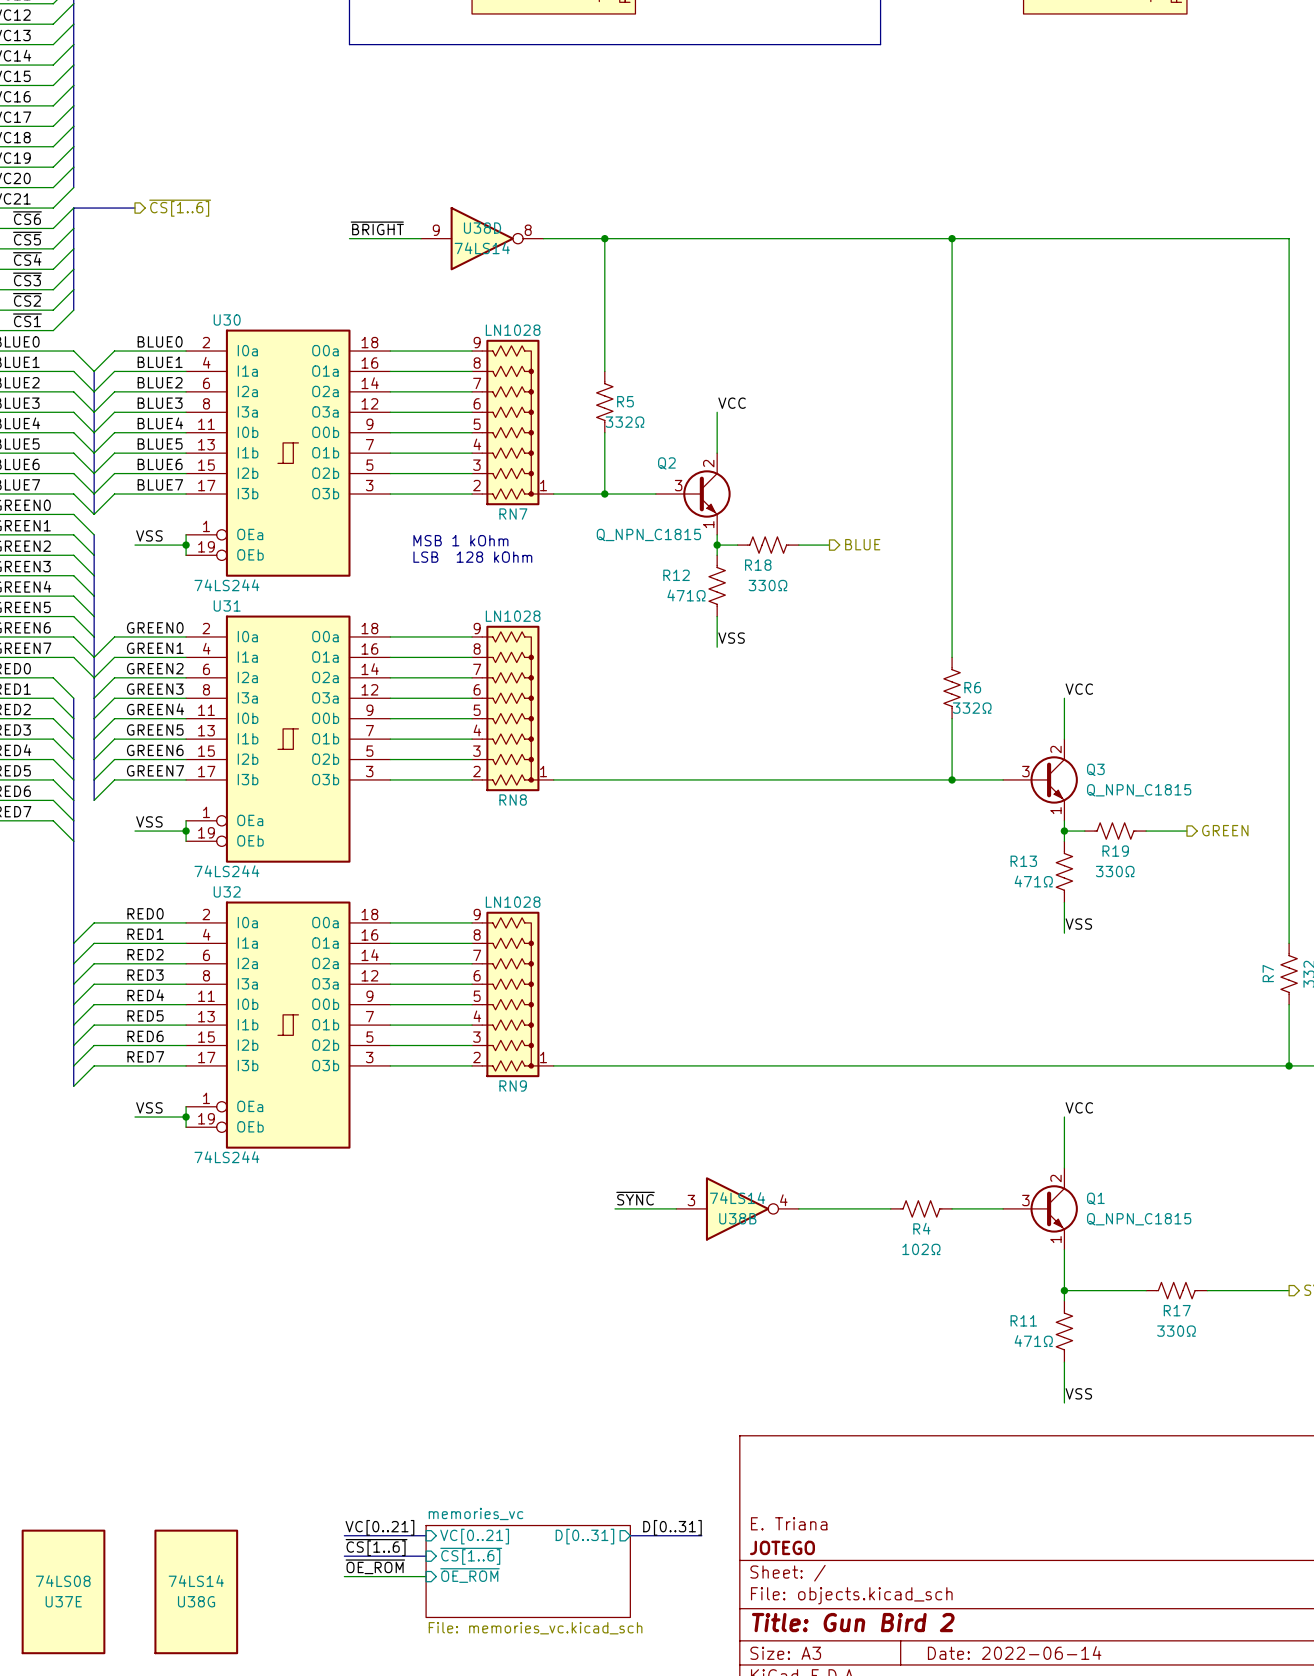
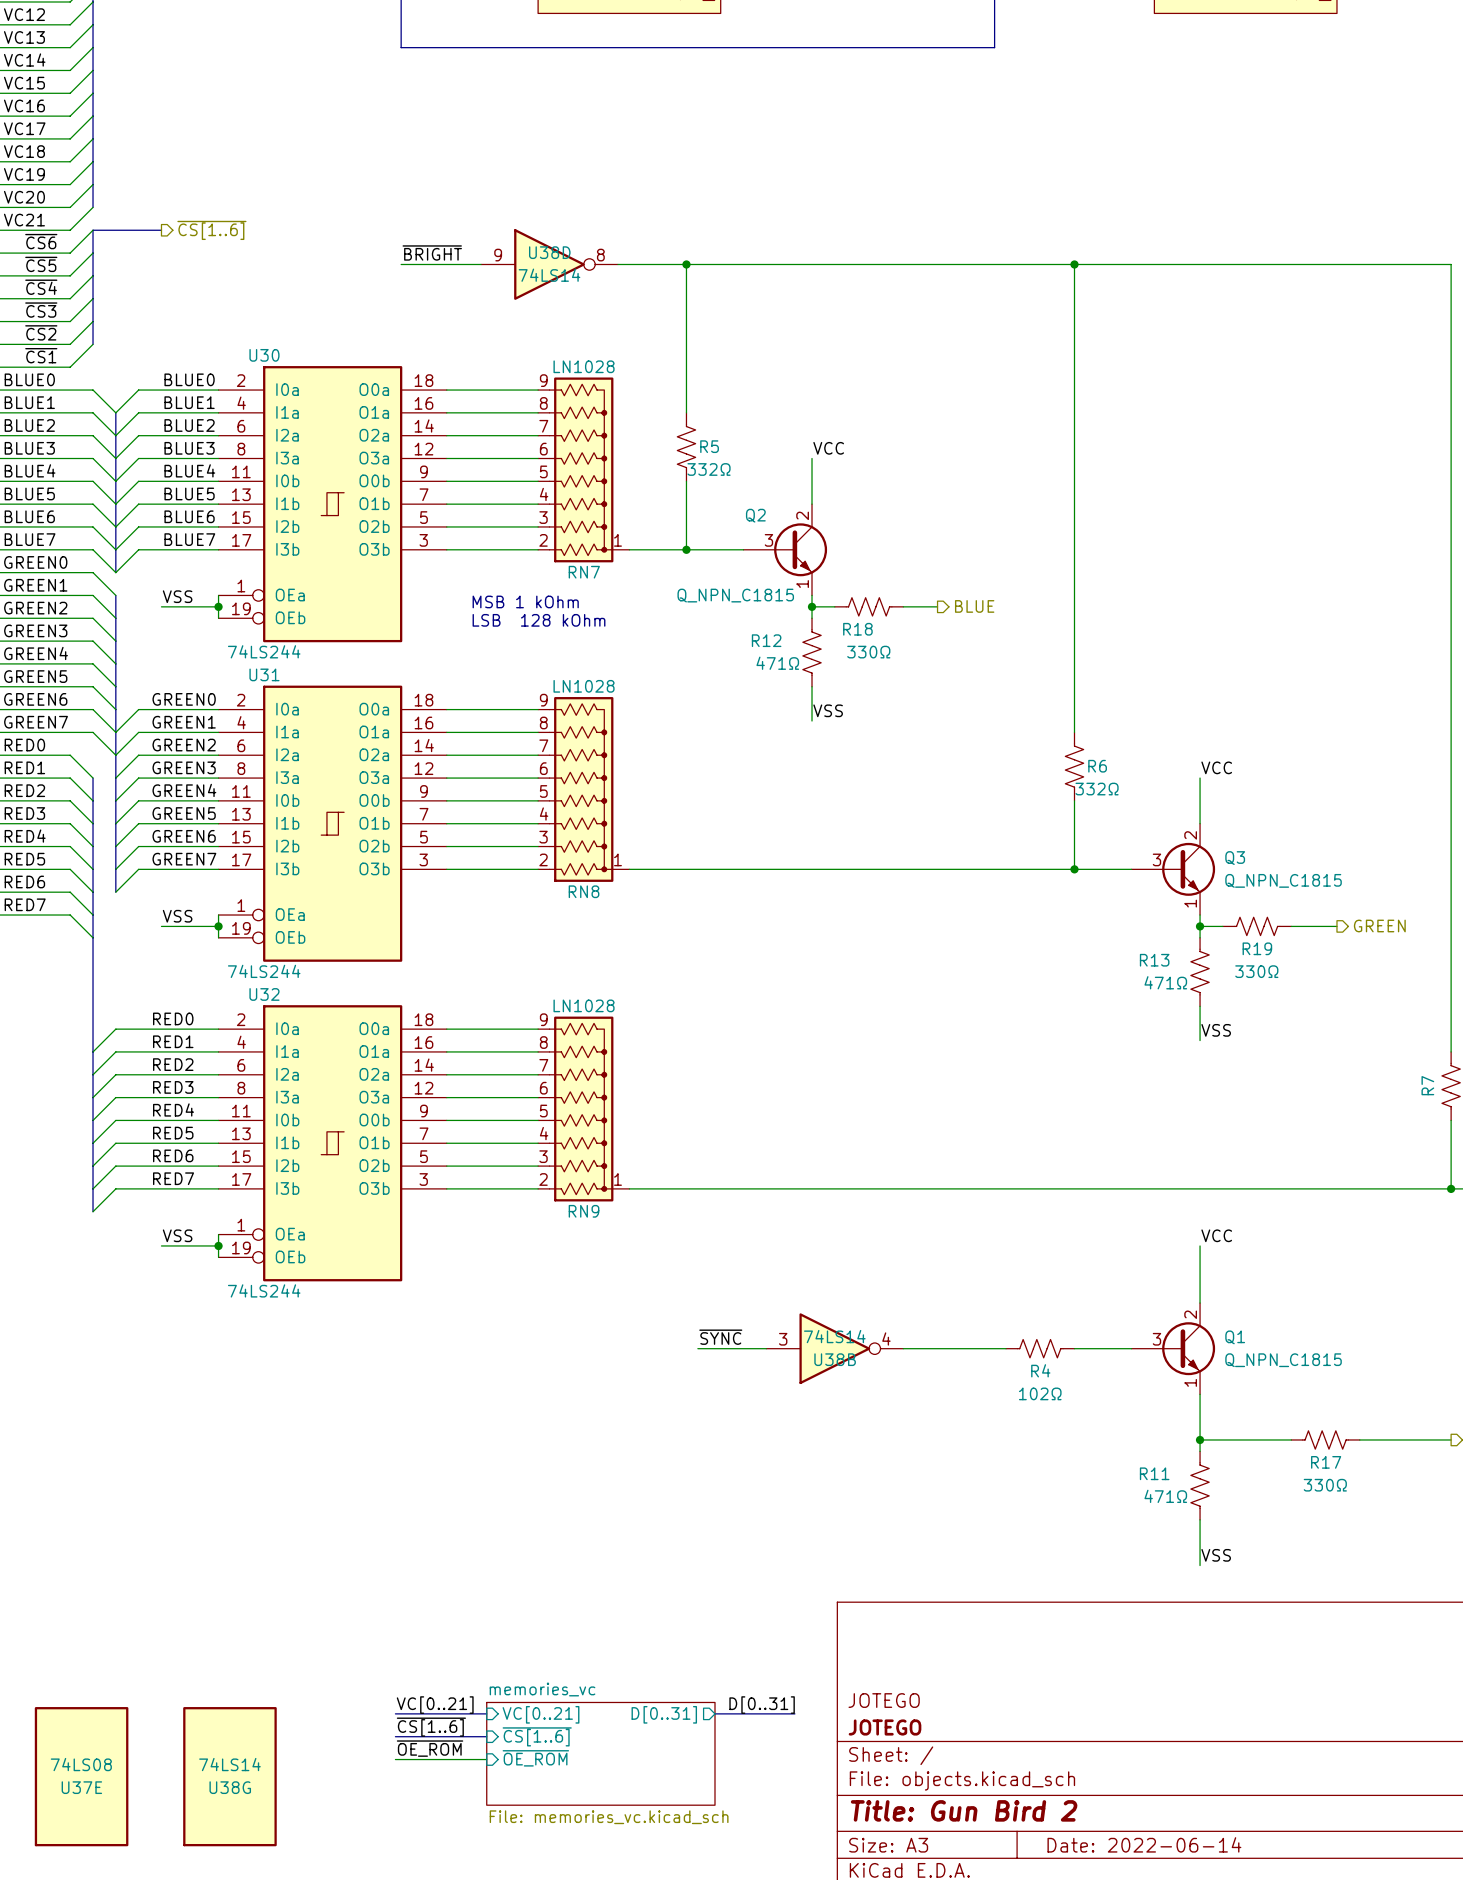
title block: E. Triana (789, 1523) -> JOTEGO (884, 1700)

